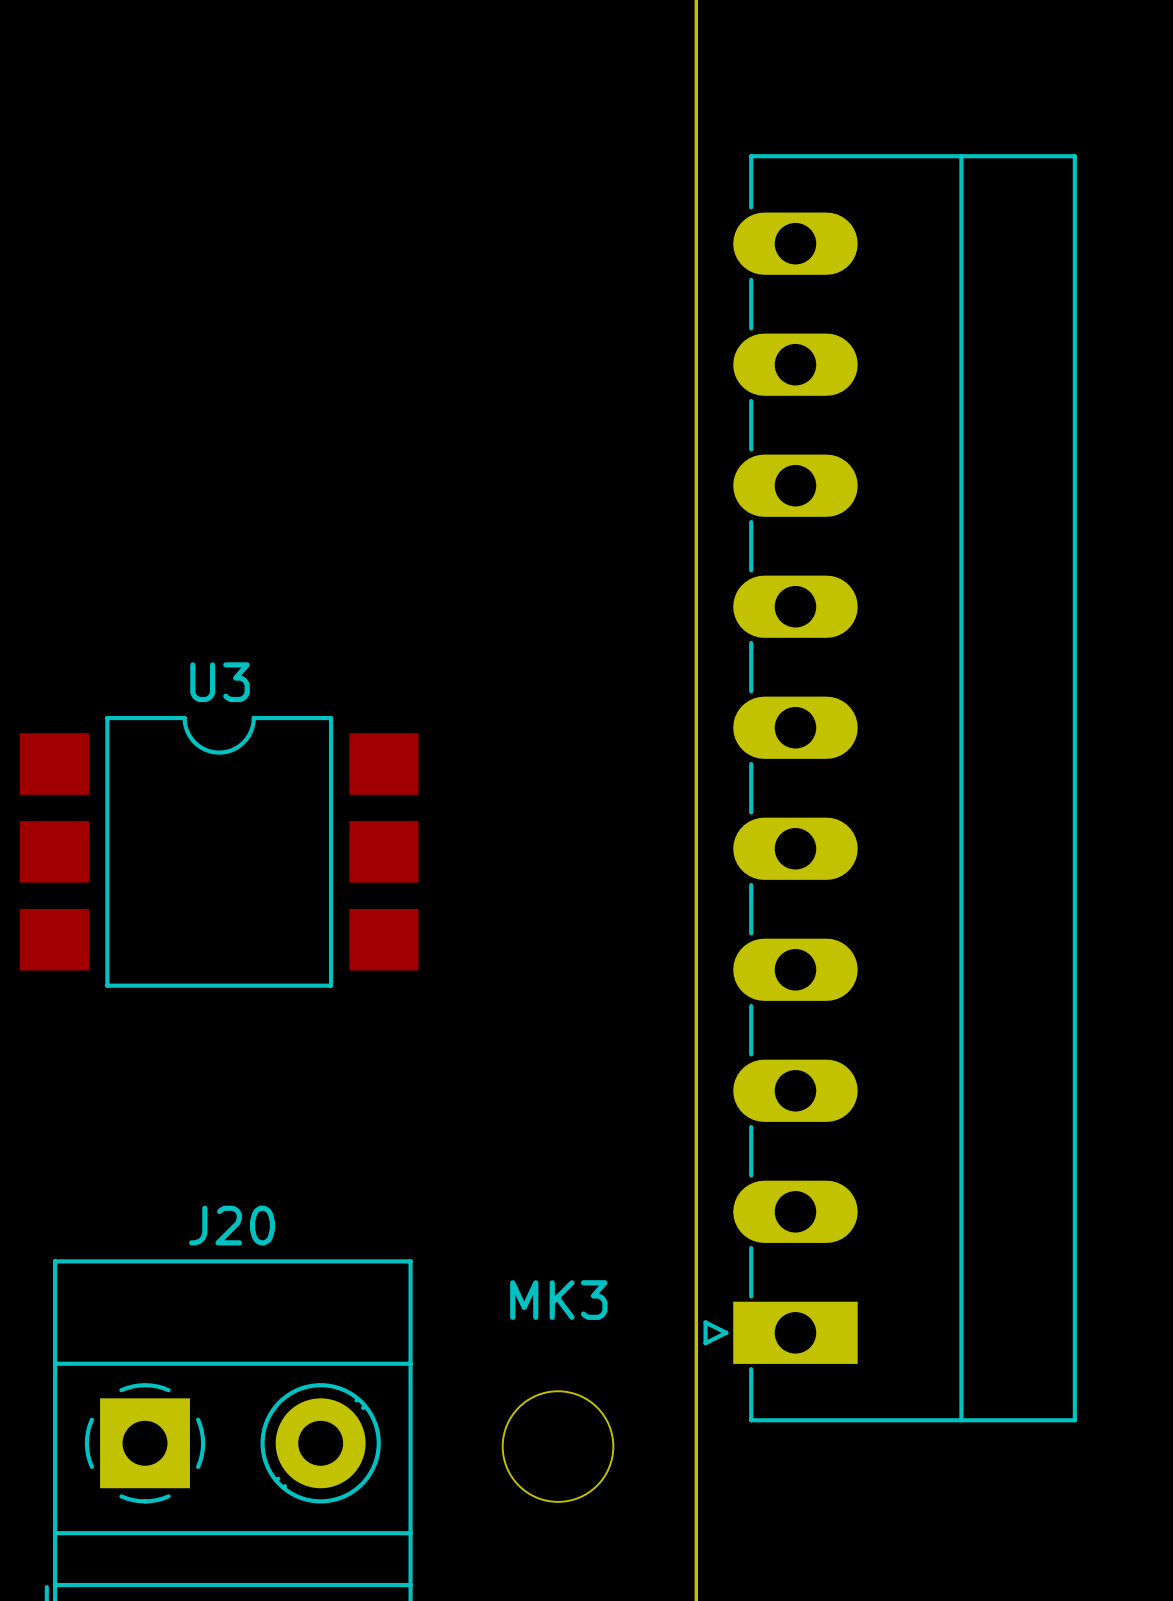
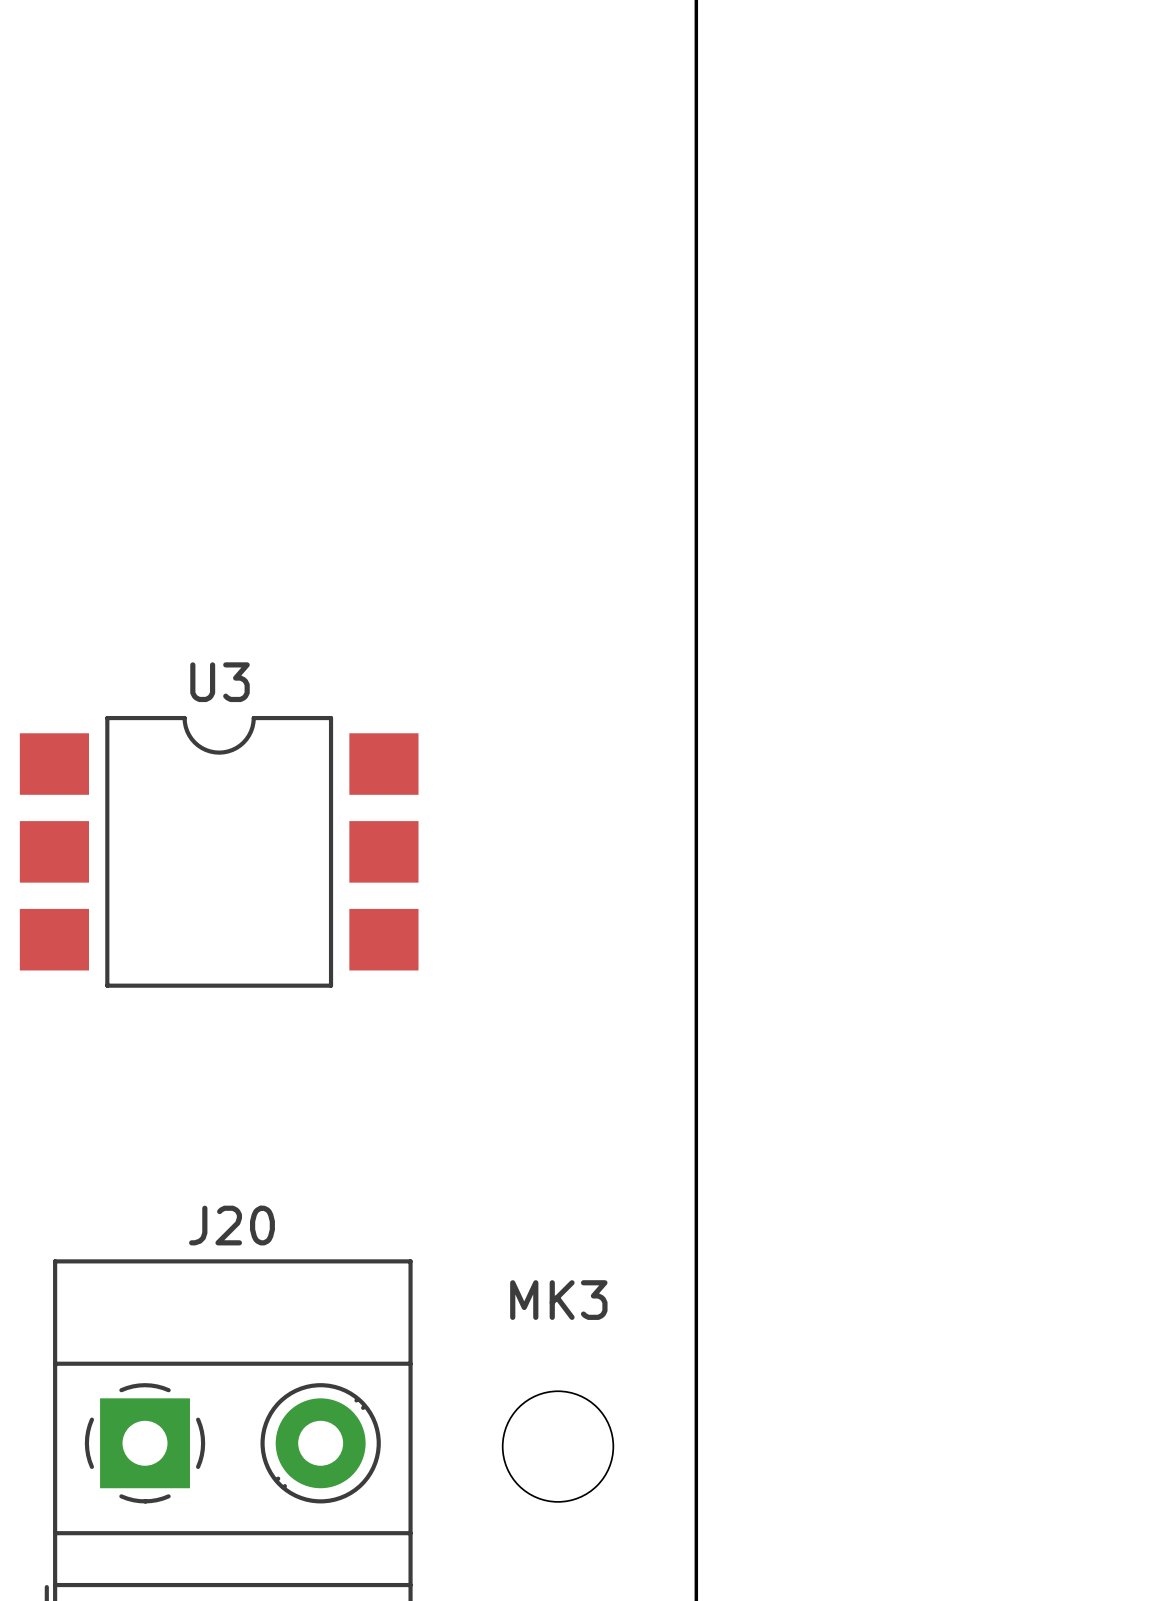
part: (890, 788) -> none

